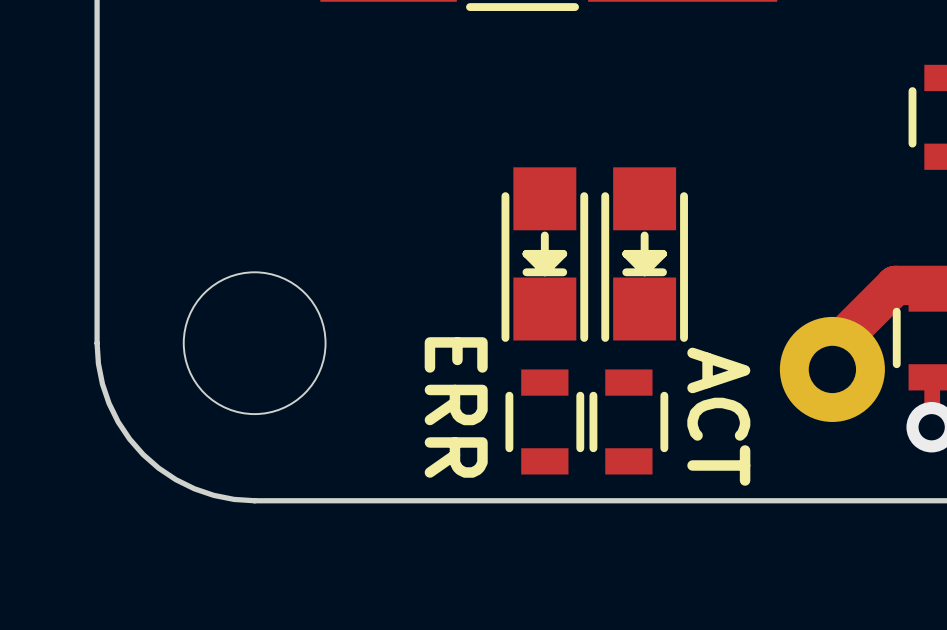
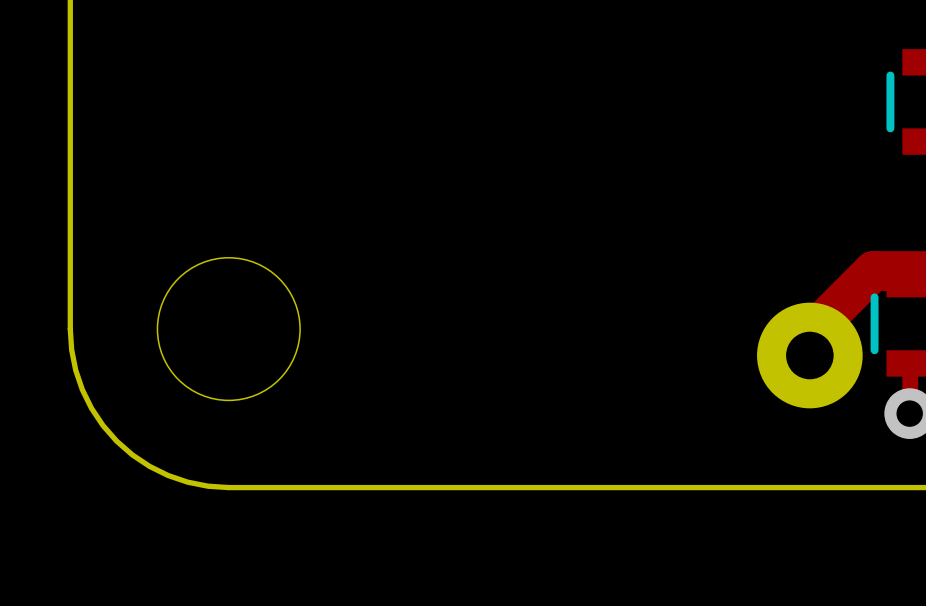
part: (544, 254) -> none
part: (644, 254) -> none
text: ERR (456, 407) -> none
text: ACT (718, 416) -> none
part: (544, 421) -> none
part: (628, 421) -> none

